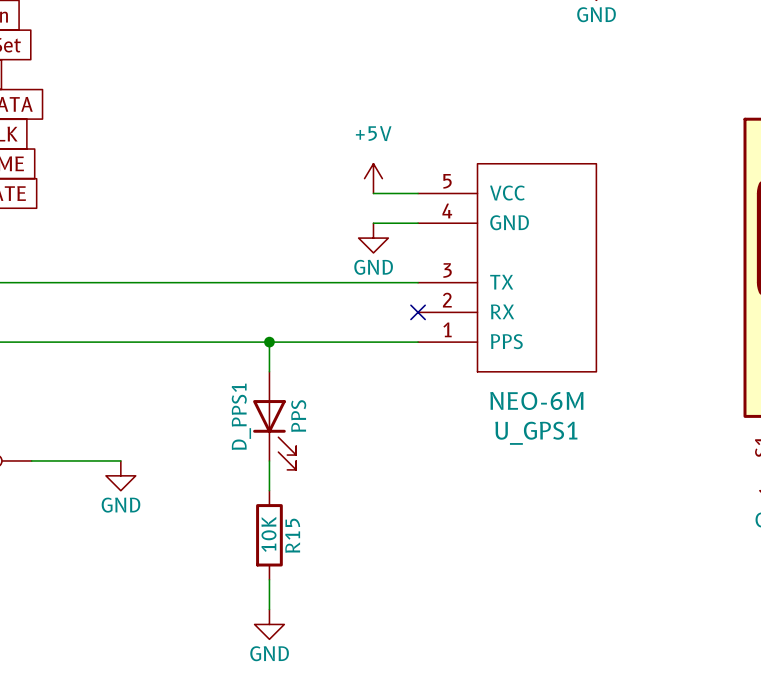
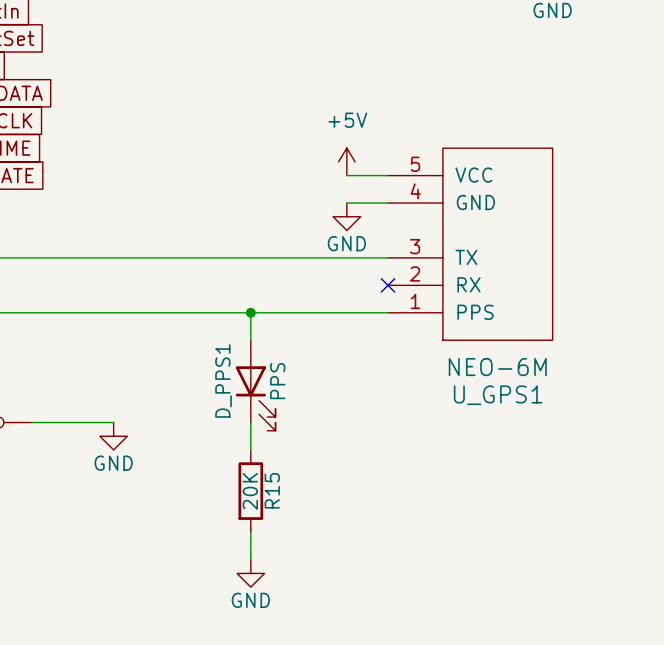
R15 value: 10K (268, 534) -> 20K (250, 491)

